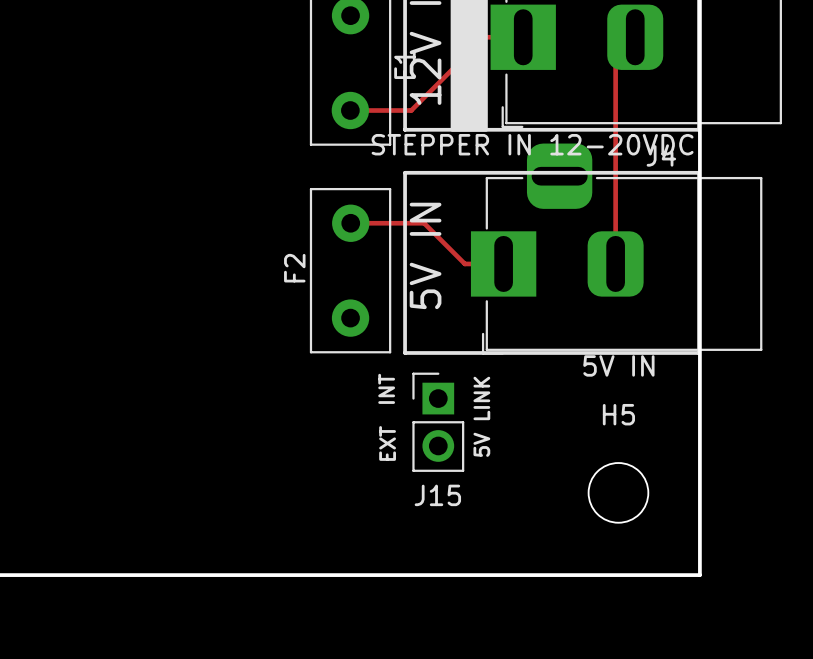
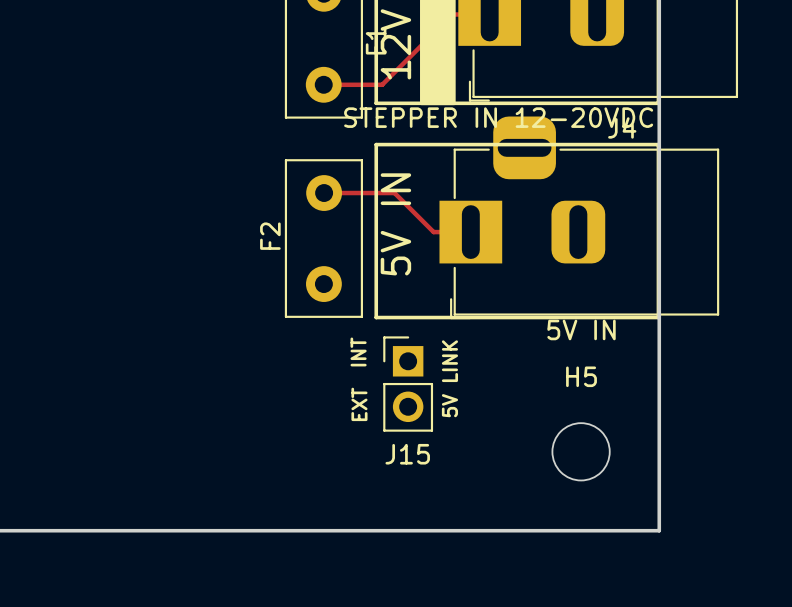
track: (635, 37) (615, 56) (615, 263) -> none

